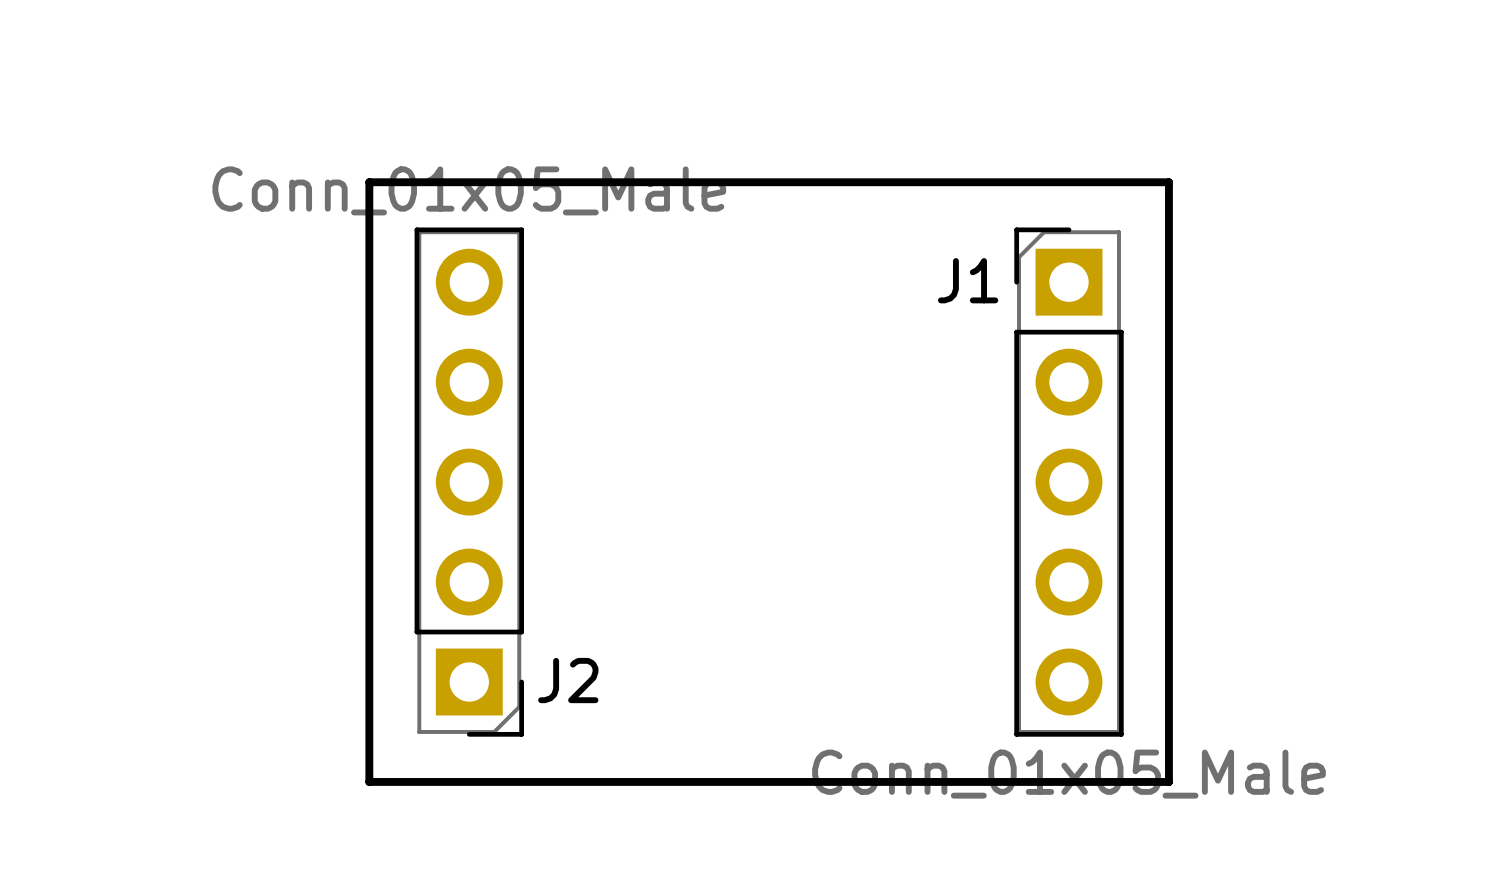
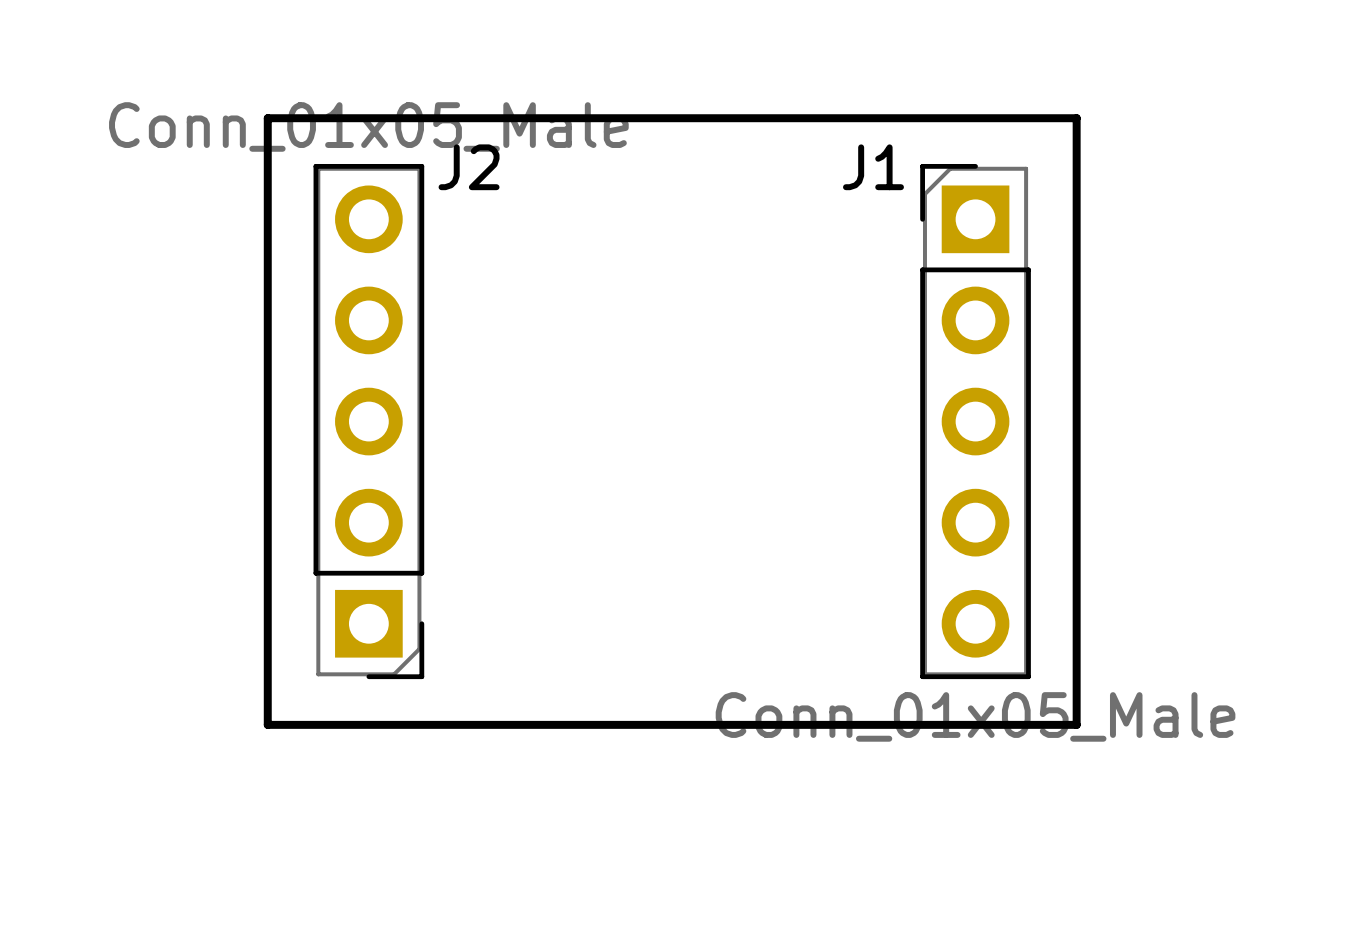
J1 name position: J1 (968, 280) -> J1 (873, 167)
J2 name position: J2 (568, 680) -> J2 (469, 167)

